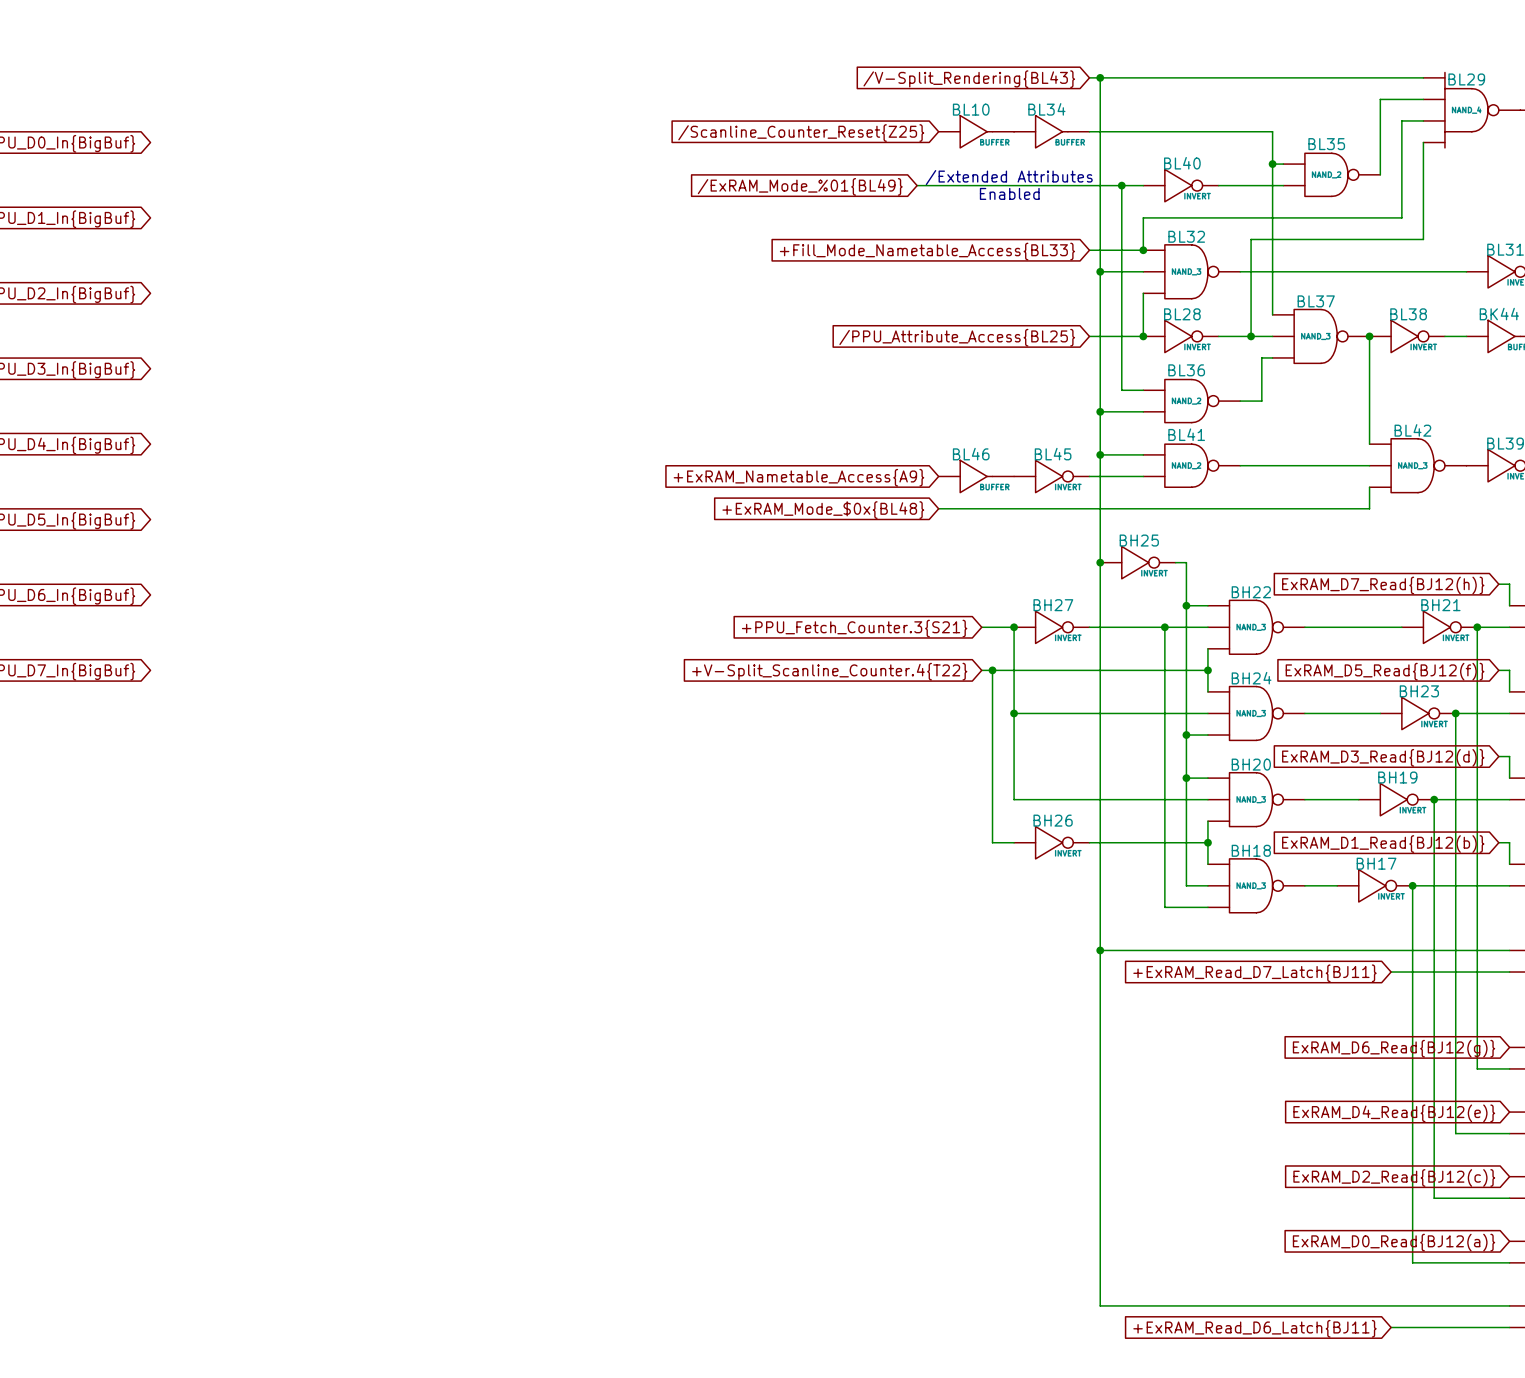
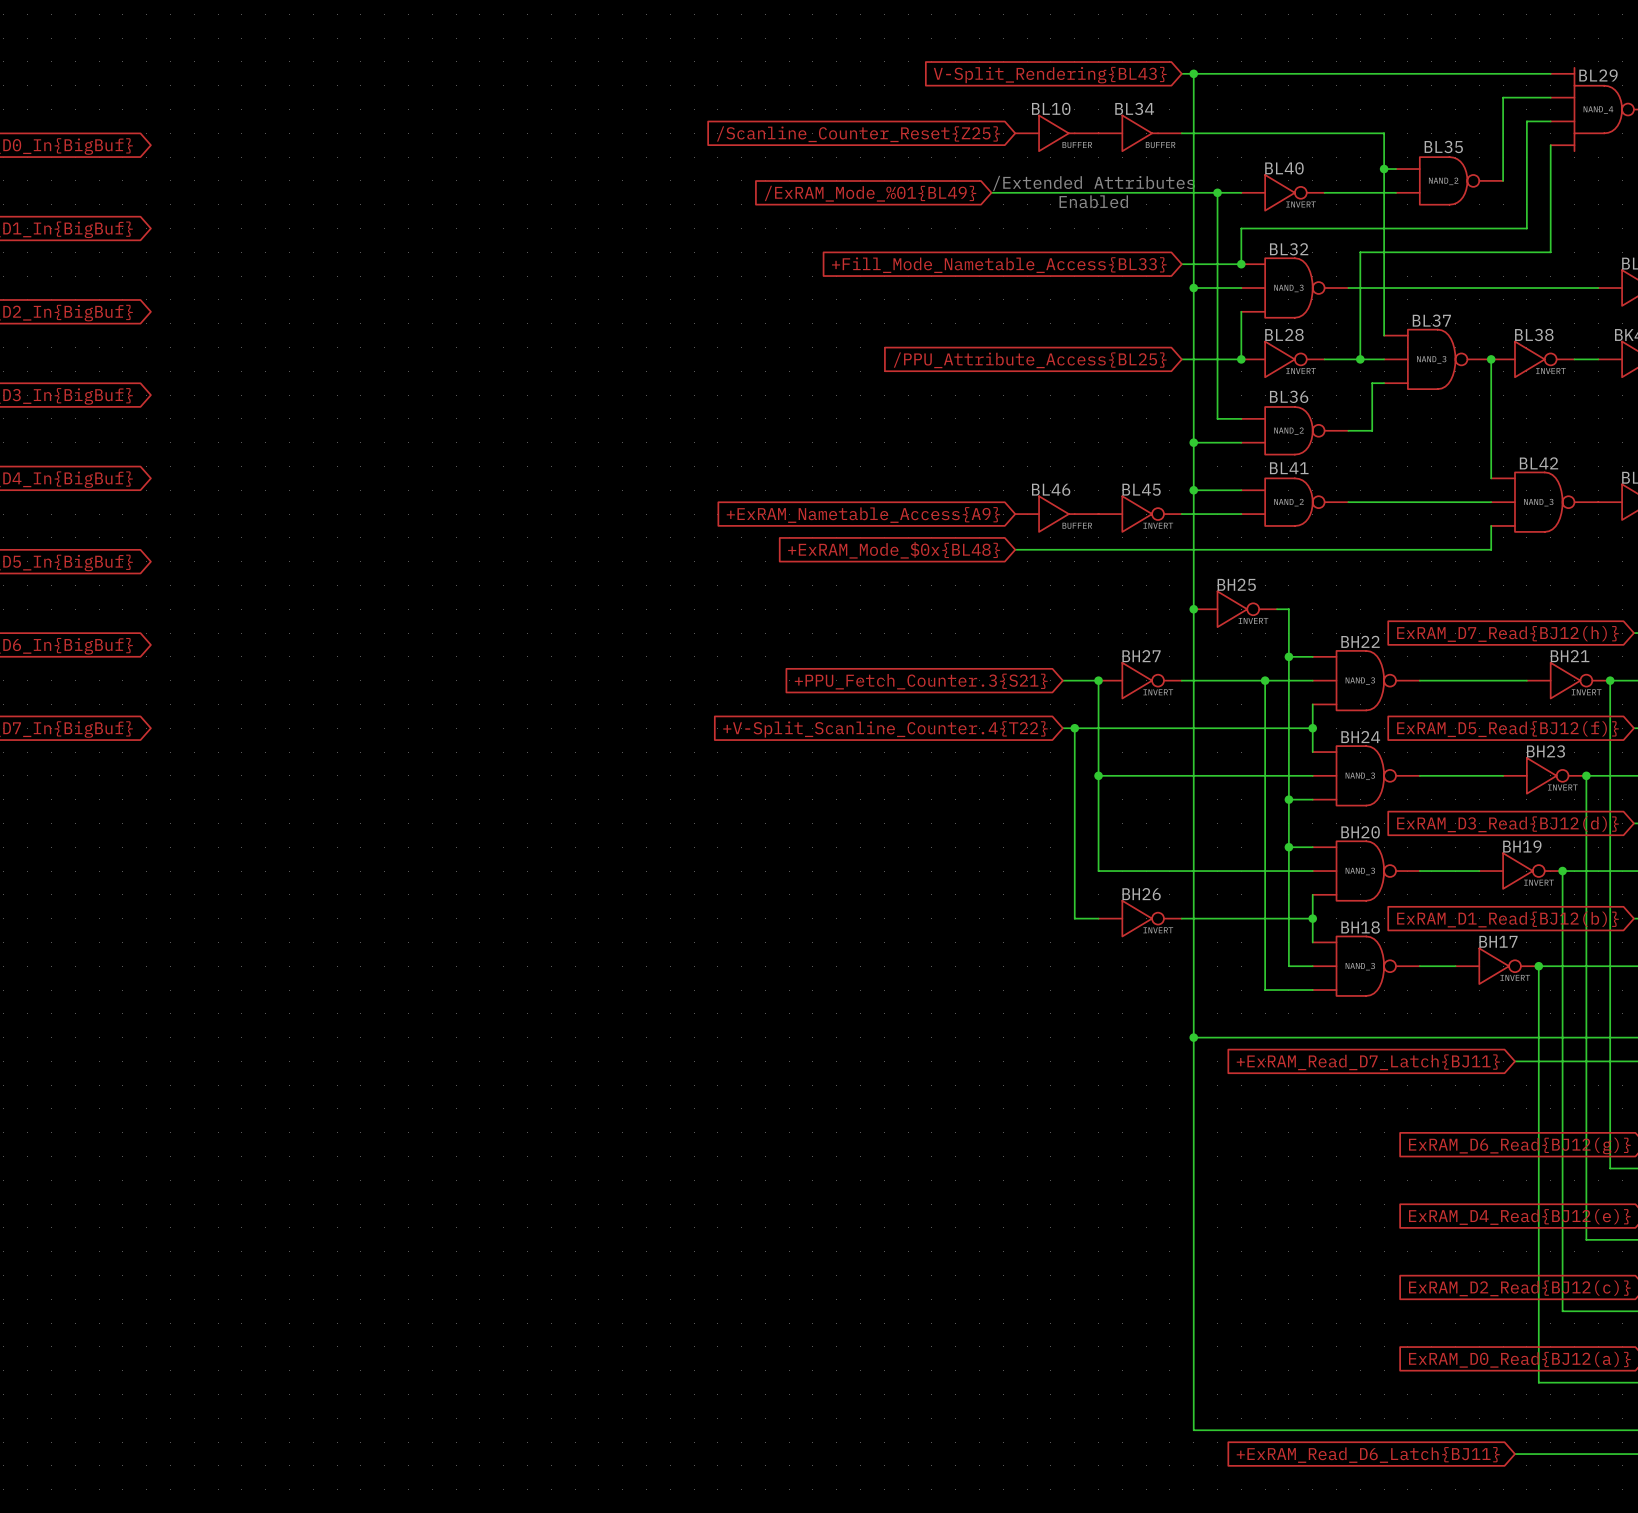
global label: /V-Split_Rendering{BL43} (969, 79) -> V-Split_Rendering{BL43} (1050, 75)

